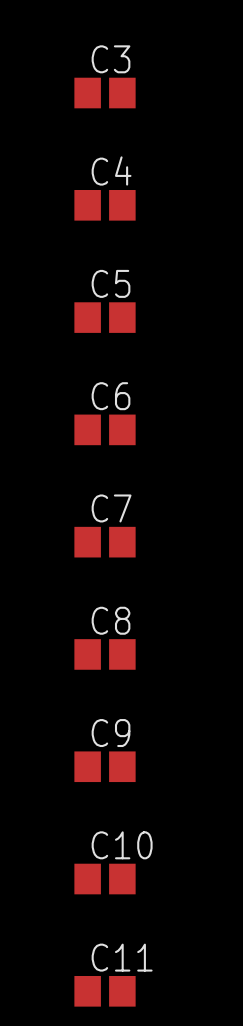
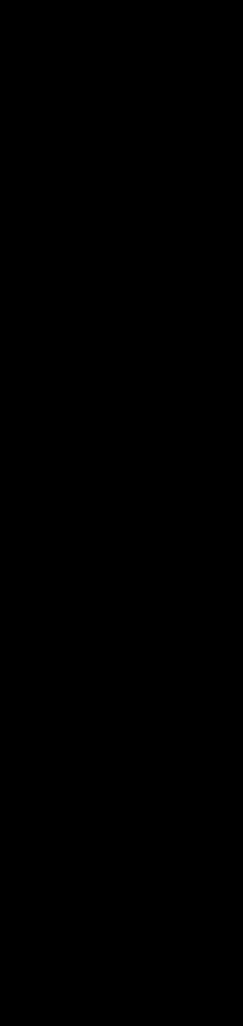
C3: (105, 93) -> none
C4: (105, 205) -> none
C5: (105, 317) -> none
C6: (105, 429) -> none
C7: (105, 542) -> none
C8: (105, 654) -> none
C9: (105, 766) -> none
C10: (105, 879) -> none
C11: (105, 991) -> none

